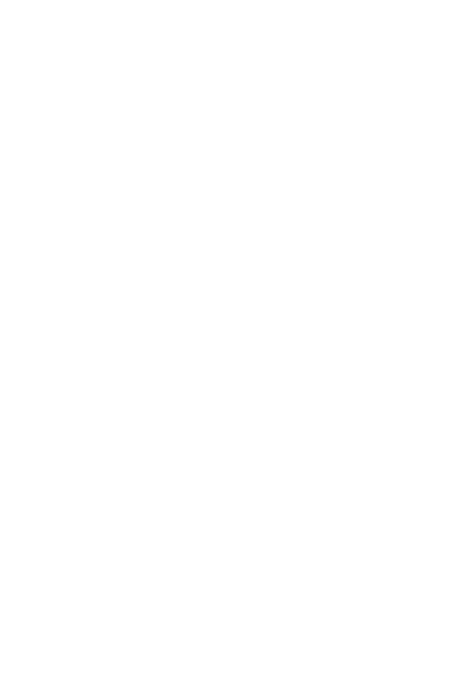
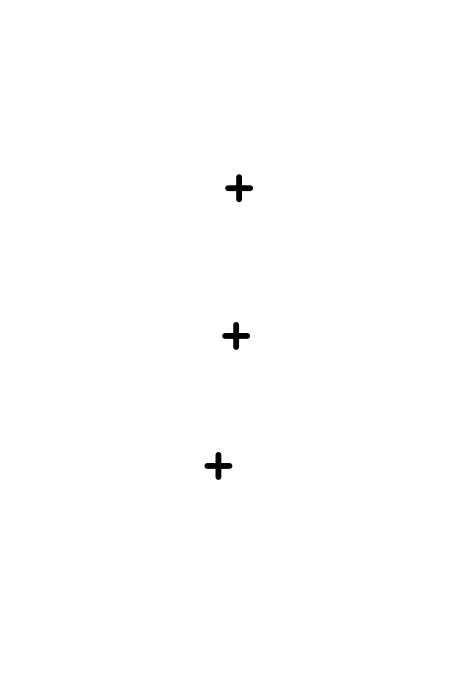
text: none -> + (239, 188)
text: none -> + (236, 335)
text: none -> + (218, 465)

